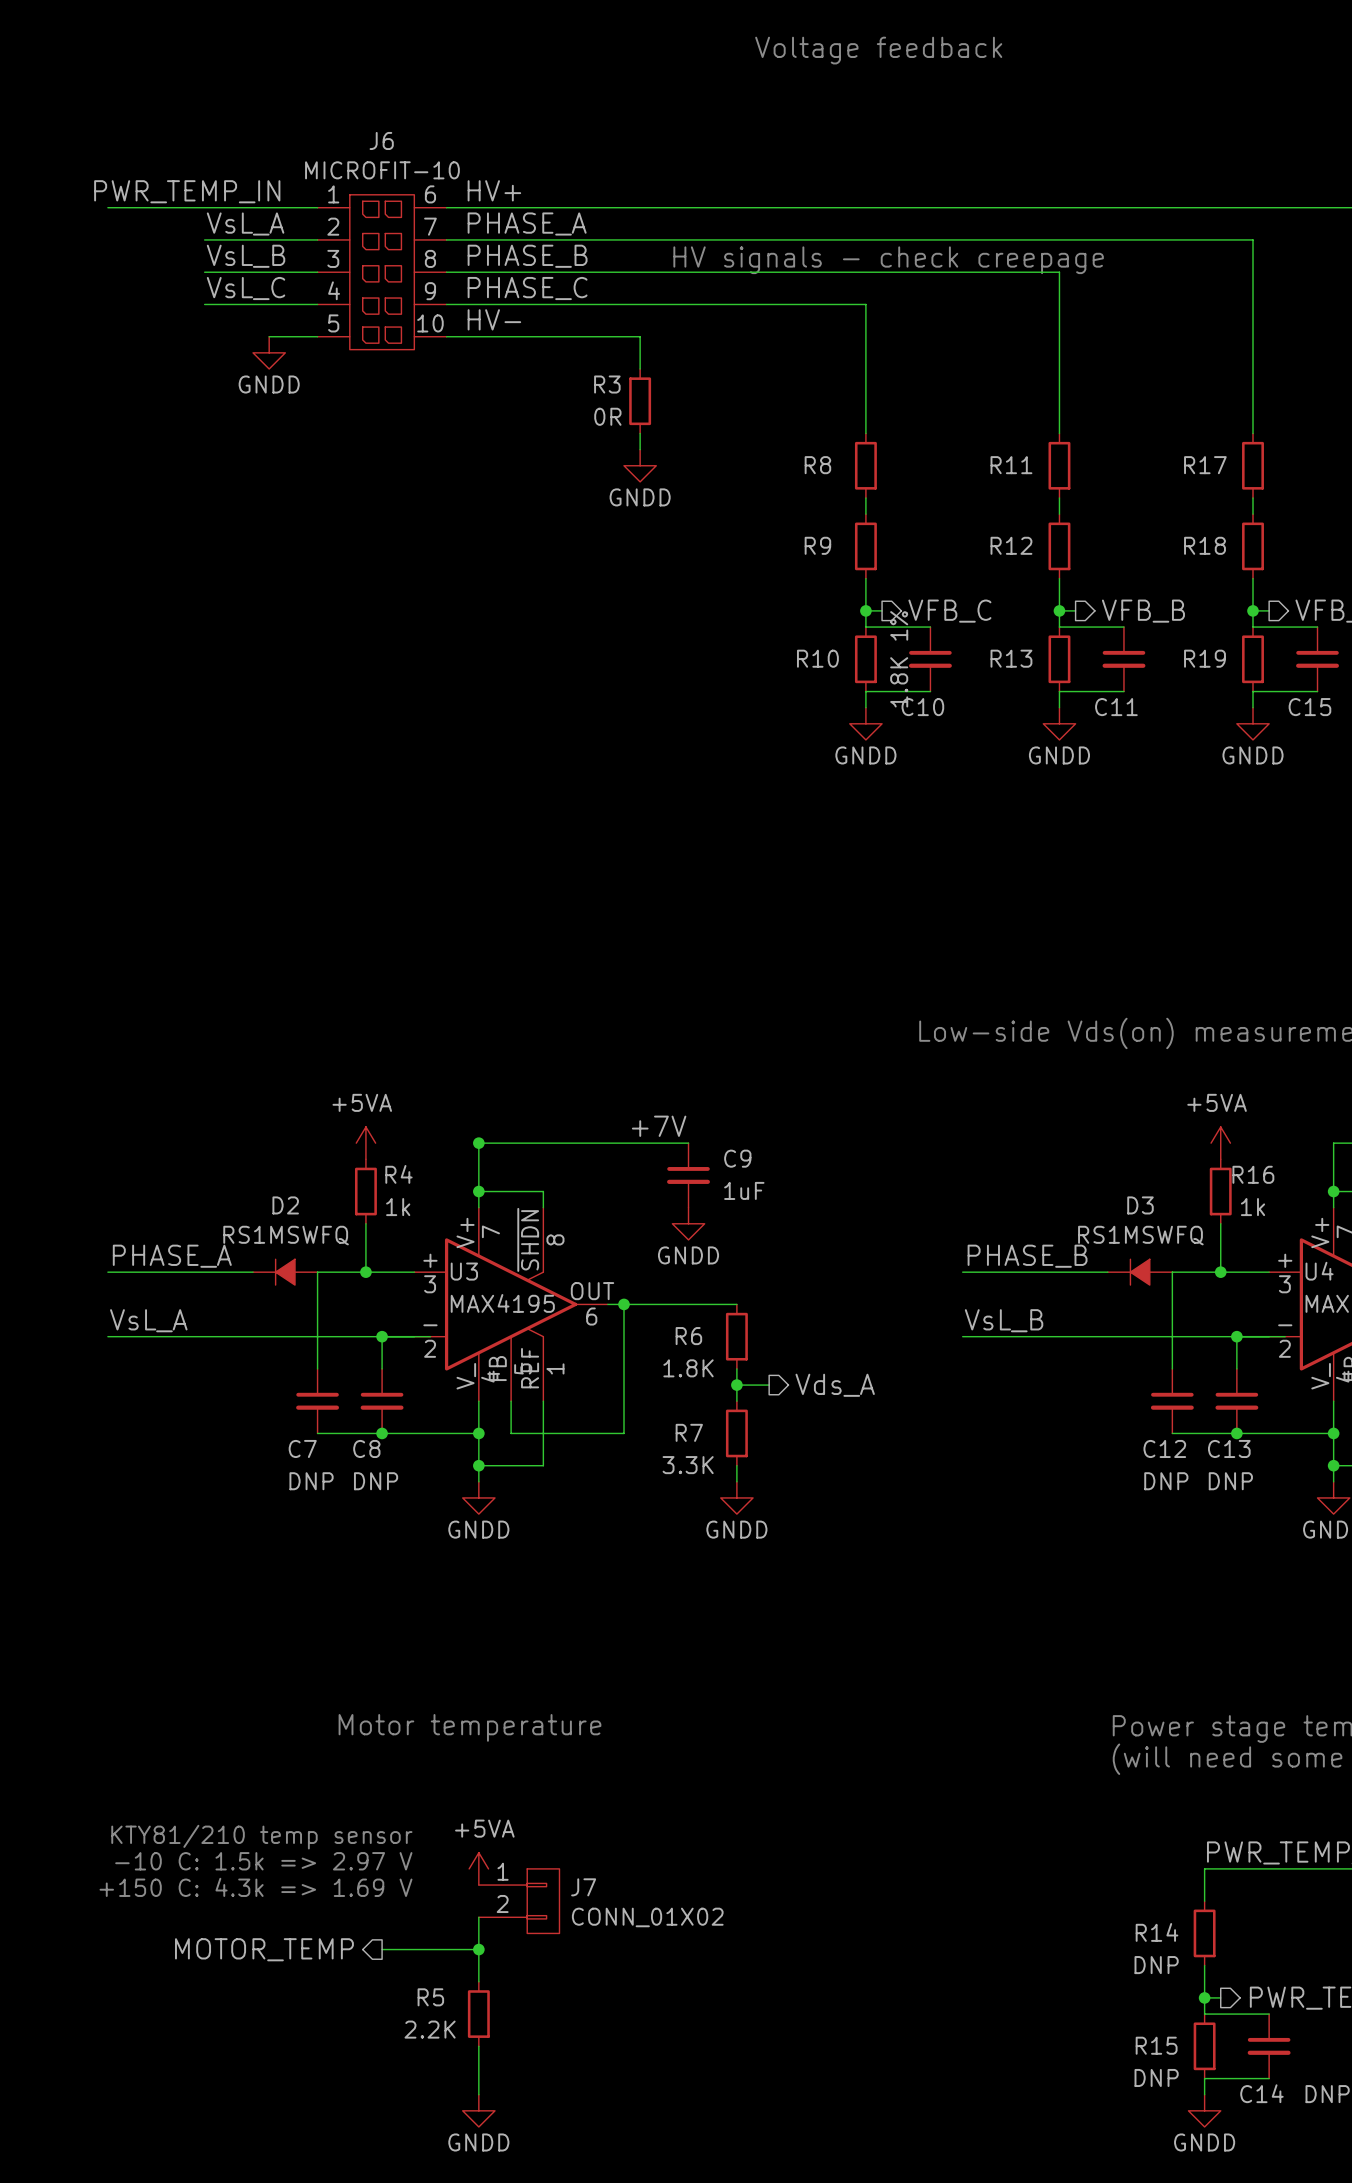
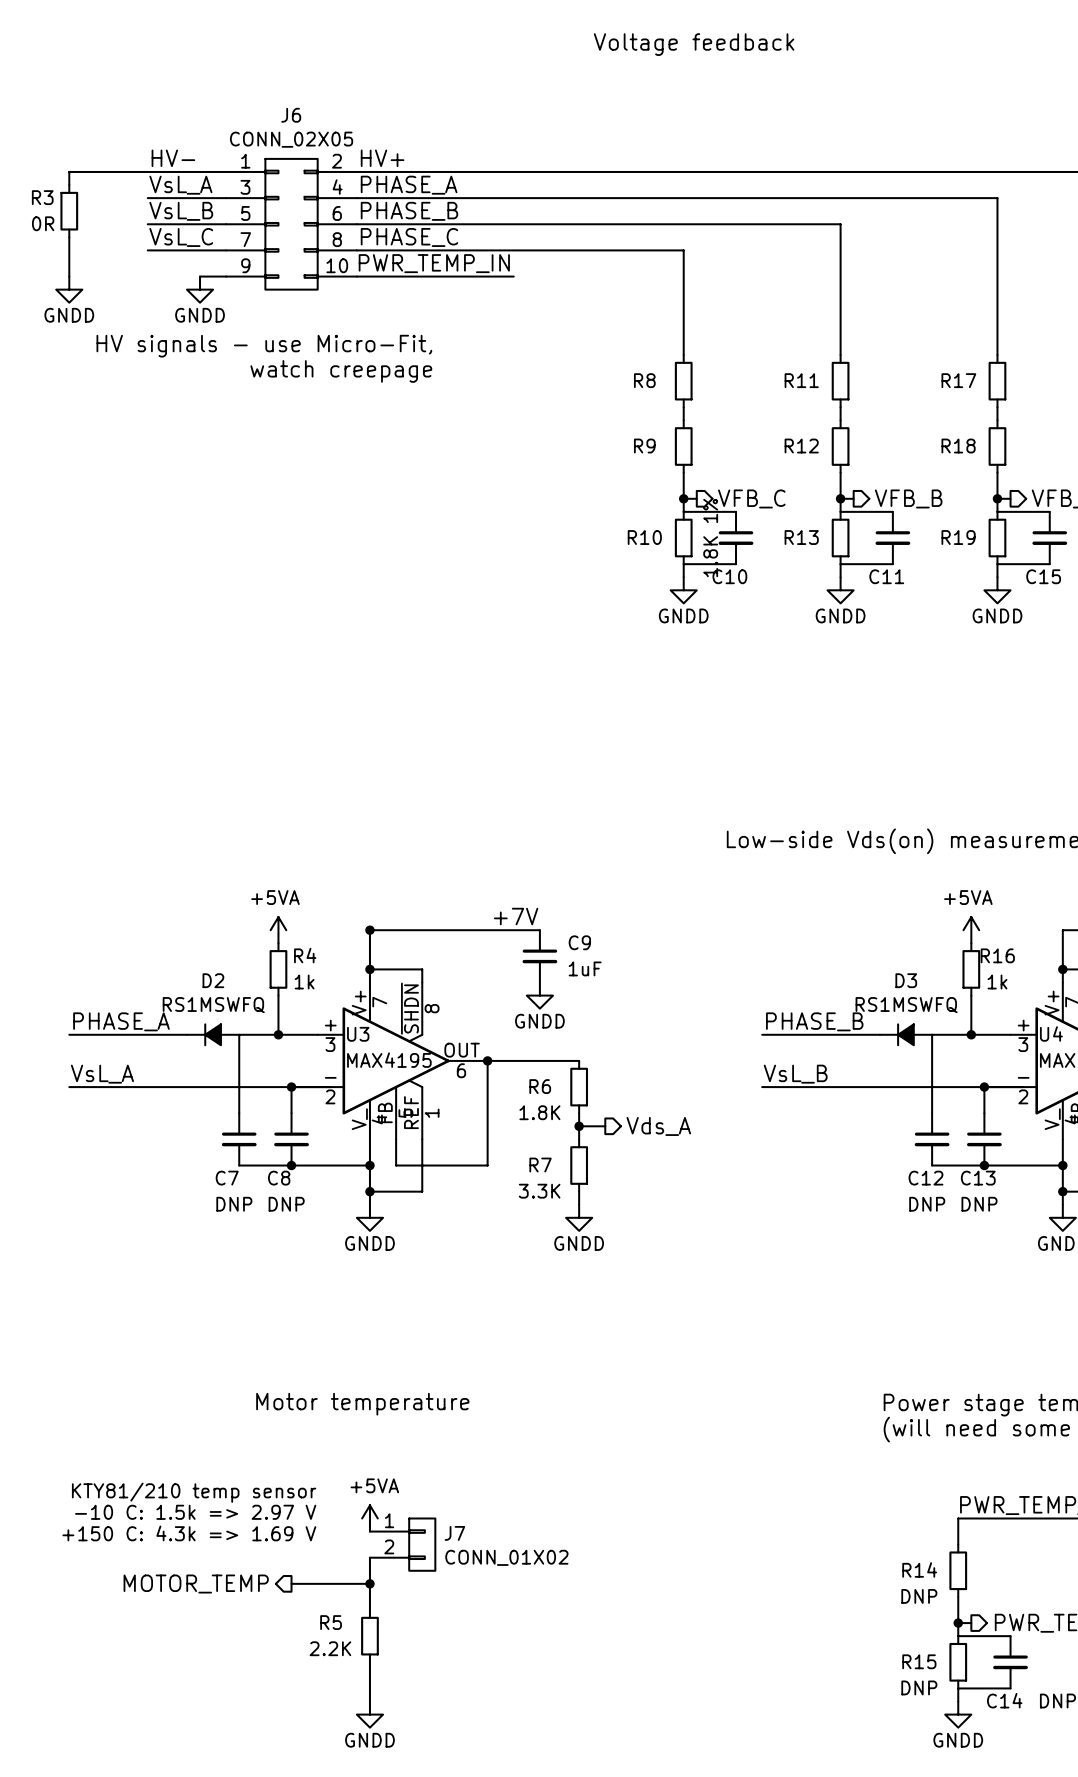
J6 value: MICROFIT-10 (382, 170) -> CONN_02X05 (291, 139)
label: PWR_TEMP_IN (187, 191) -> none
J6 symbol: [317, 194, 447, 350] -> [226, 158, 357, 290]
wire: none -> (69, 171) (69, 185)
text: HV signals - check creepage (888, 260) -> none
wire: none -> (69, 237) (69, 276)
label position: HV- (494, 319) -> HV- (173, 158)
label: none -> PWR_TEMP_IN (434, 263)
wire: (640, 336) (640, 368) -> (500, 276) (513, 276)
power symbol: none -> GNDD (69, 289)
R3 position: (640, 401) -> (69, 211)
text: none -> HV signals - use Micro-Fit, (264, 346)
wire: (640, 433) (640, 449) -> none
text: none -> watch creepage (341, 371)
power symbol: GNDD (640, 465) -> none

